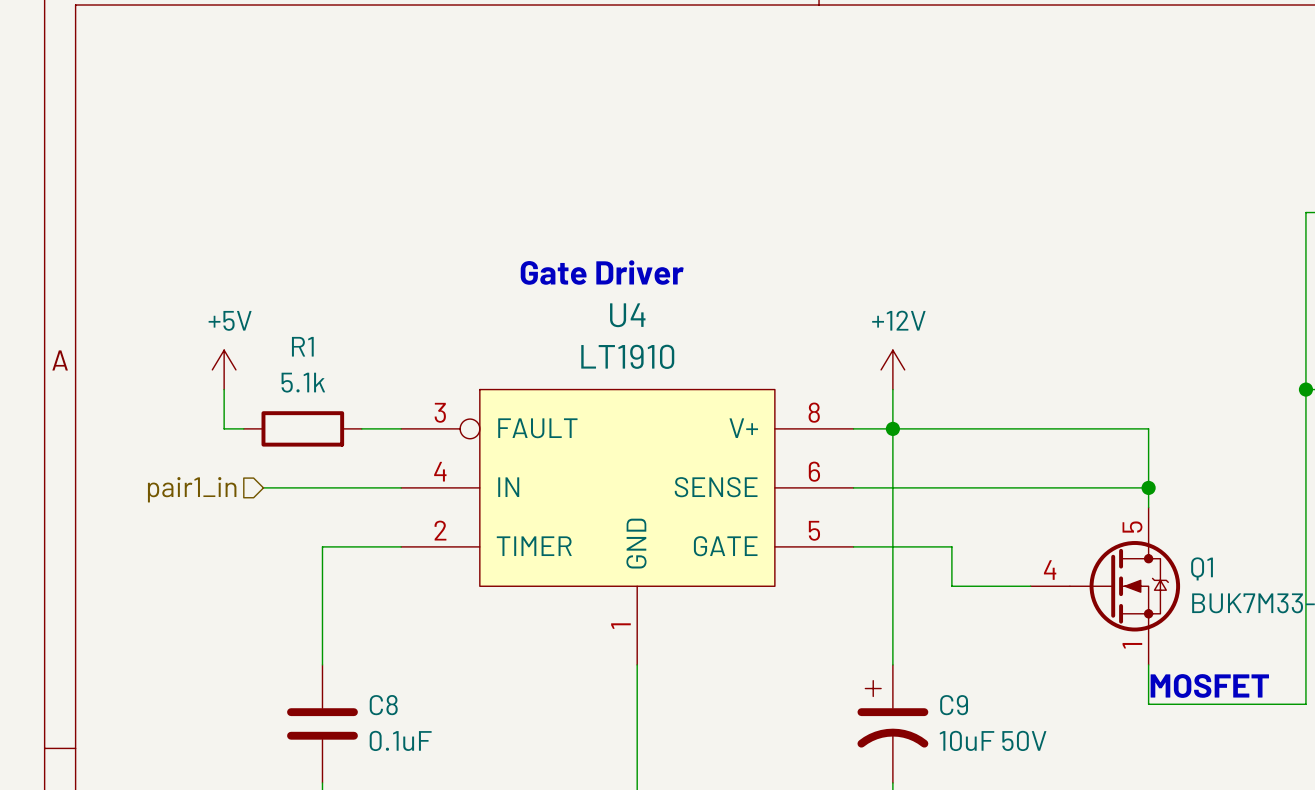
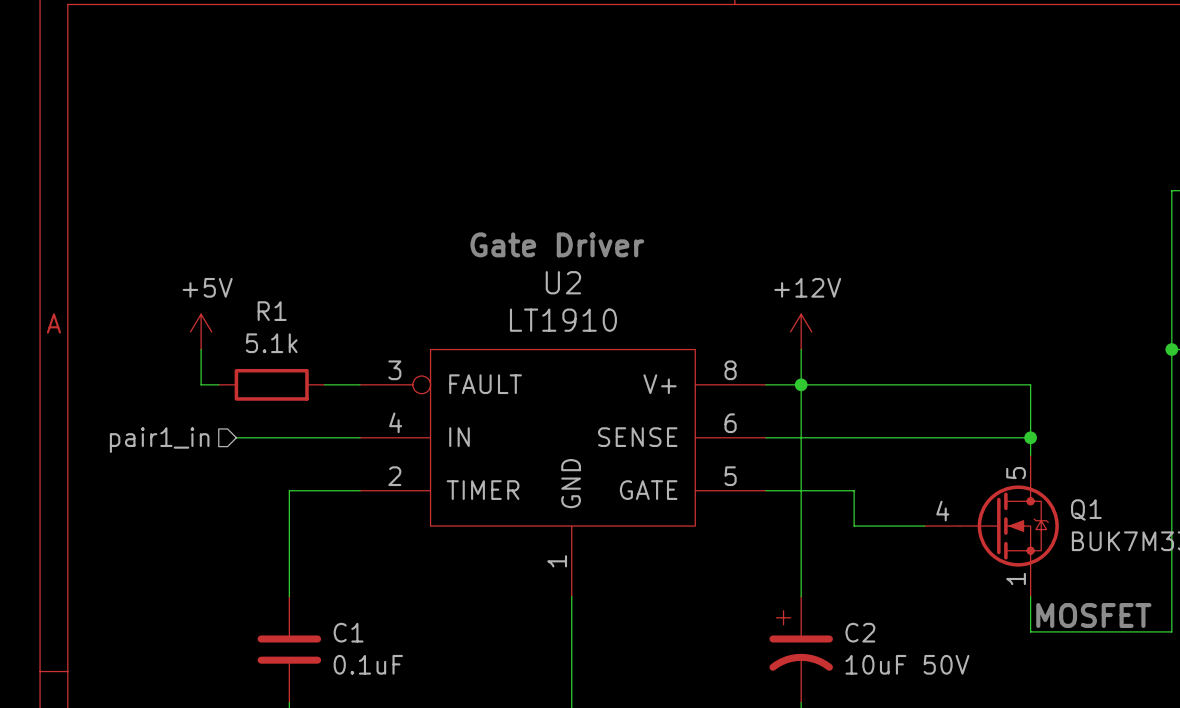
U4 name: U4 (627, 315) -> U2 (563, 282)
C8 name: C8 (383, 705) -> C1 (348, 632)
C9 name: C9 (954, 705) -> C2 (860, 632)

